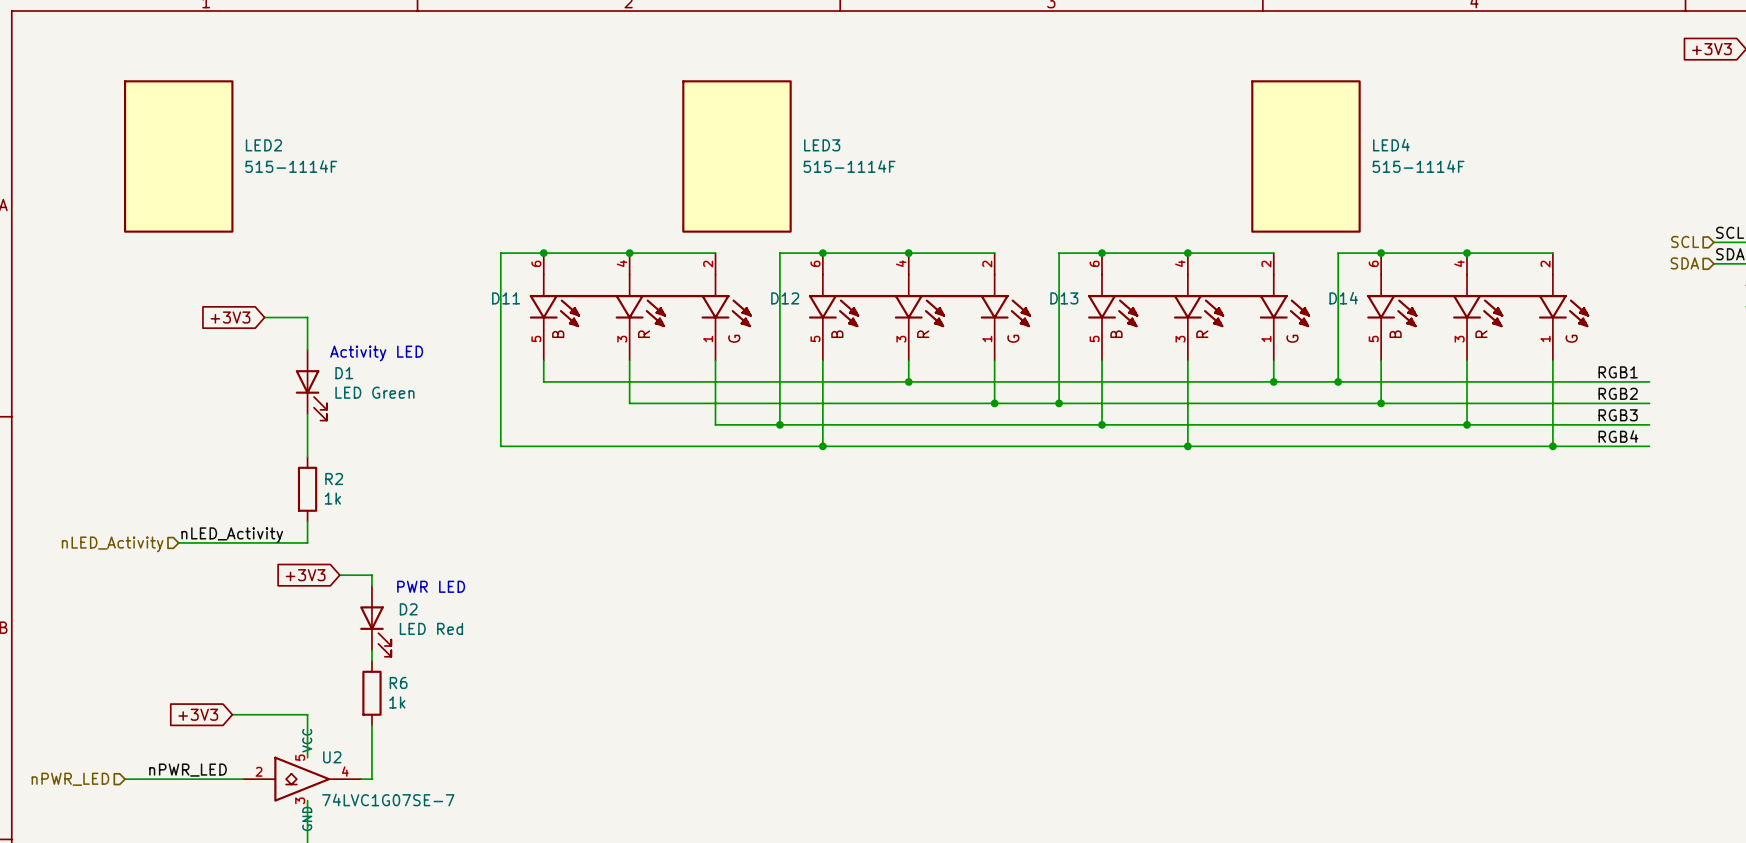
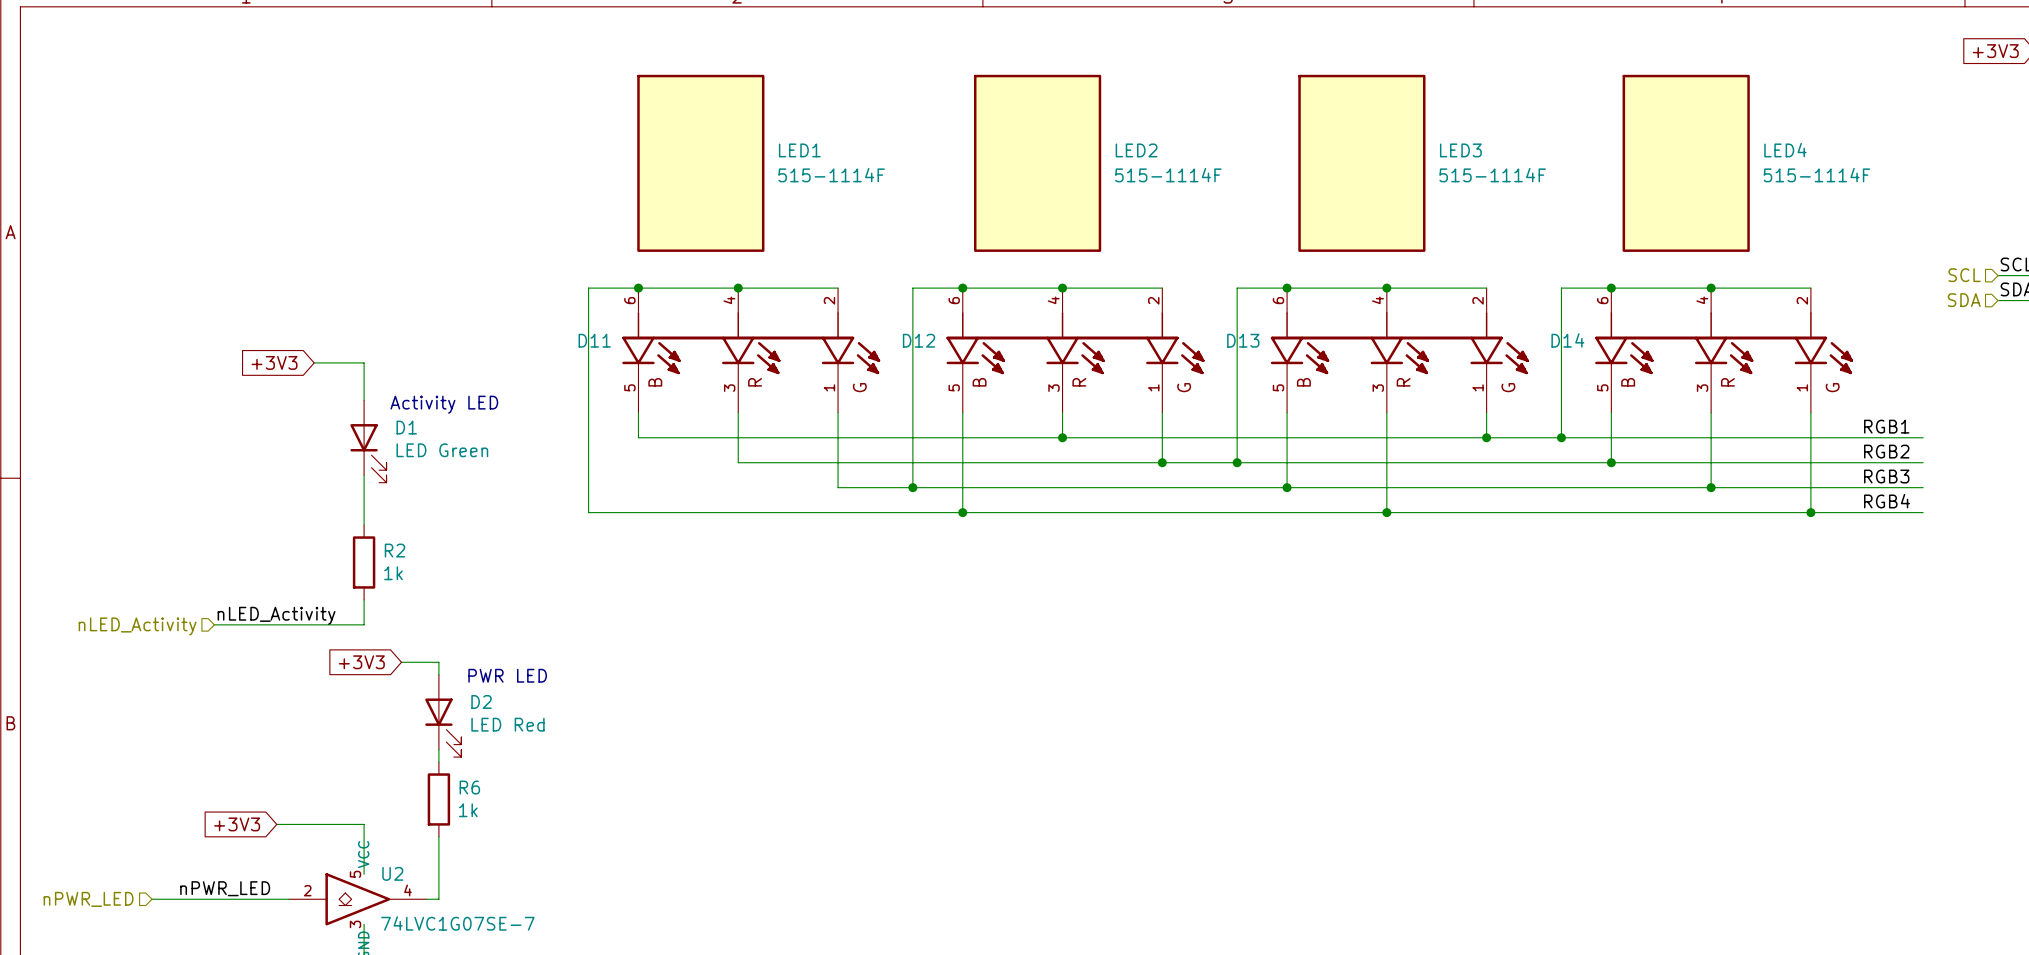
LED1: none -> 515-1114F (700, 163)
LED2 position: (178, 156) -> (1037, 163)
LED3 position: (736, 156) -> (1361, 163)
LED4 position: (1305, 156) -> (1686, 163)

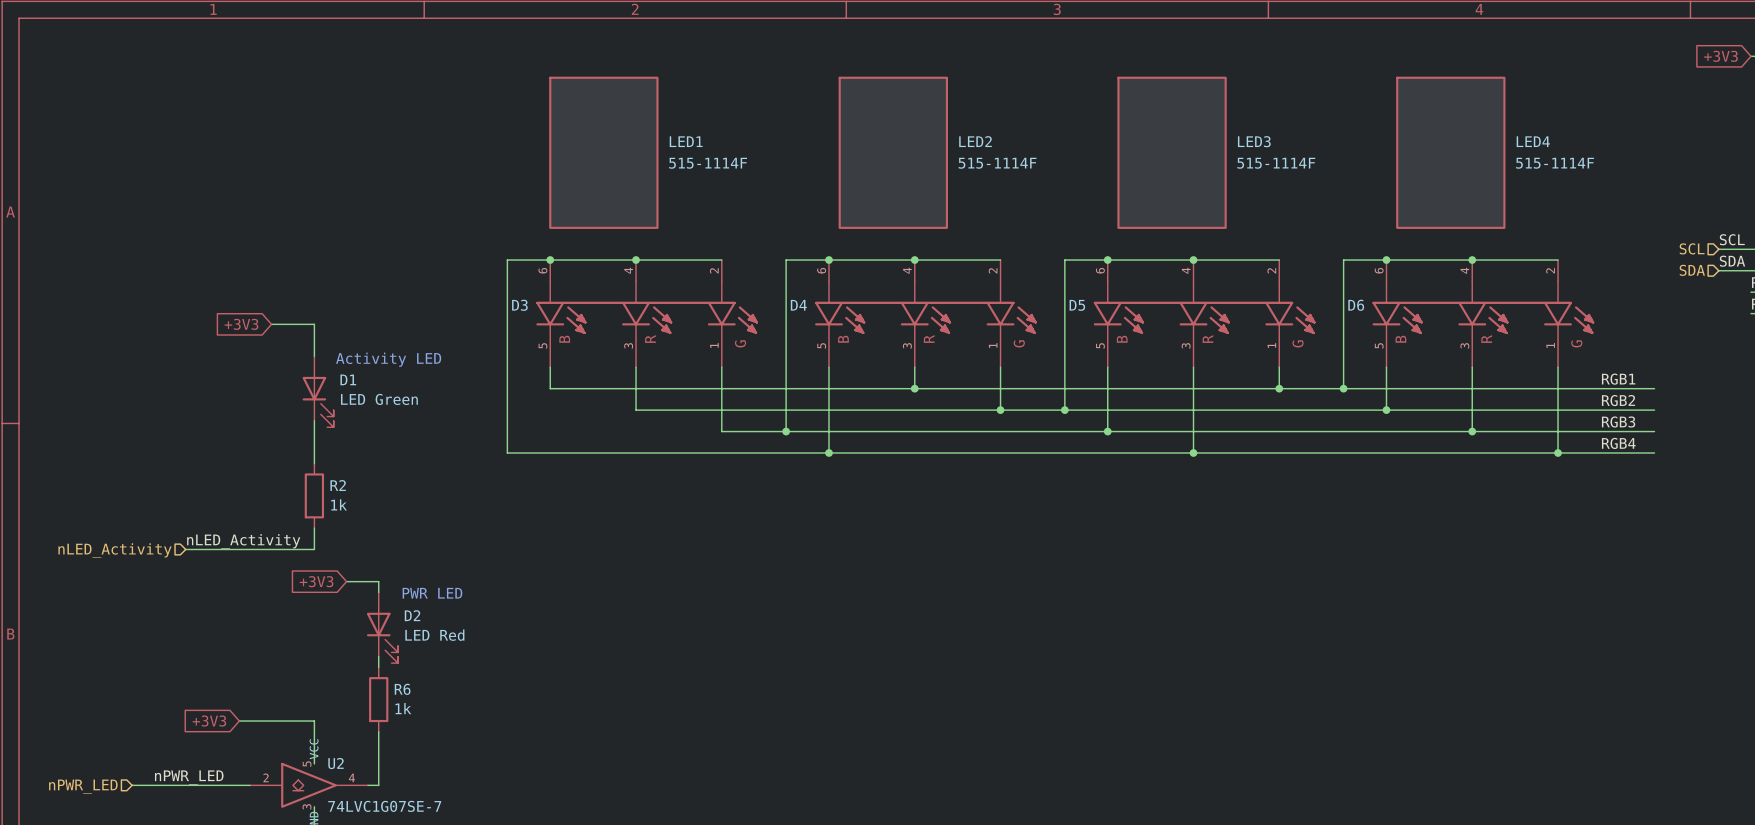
D11 name: D11 (594, 340) -> D3 (519, 305)
D12 name: D12 (919, 340) -> D4 (798, 305)
D13 name: D13 (1243, 340) -> D5 (1077, 305)
D14 name: D14 (1567, 340) -> D6 (1356, 305)

